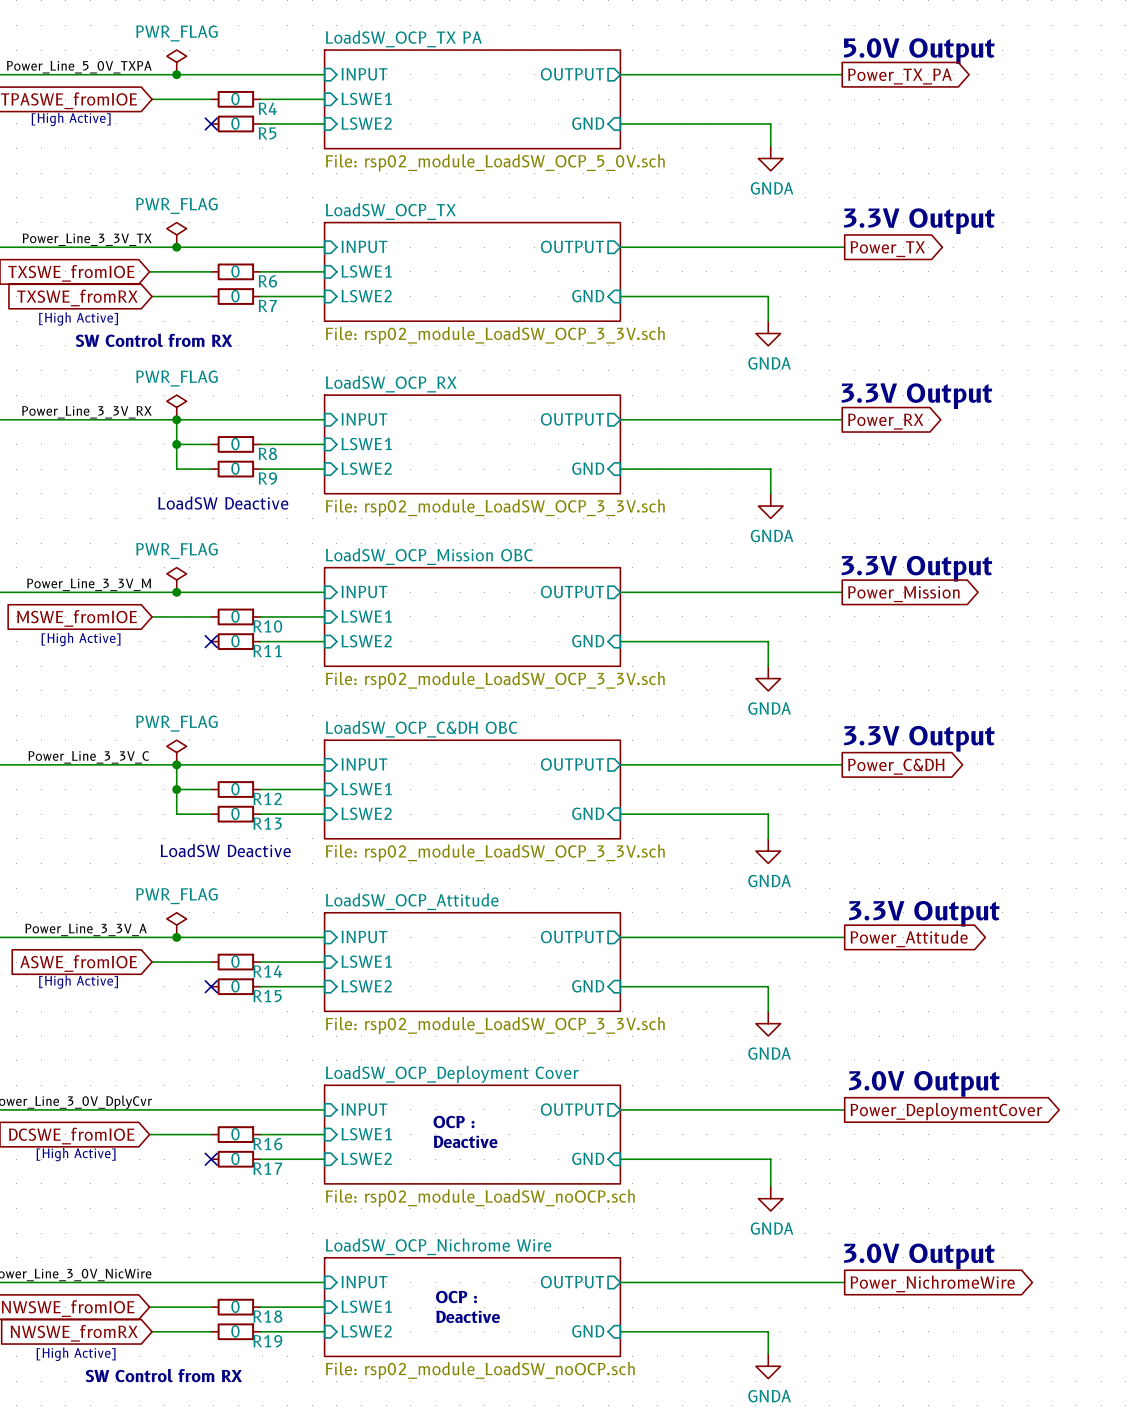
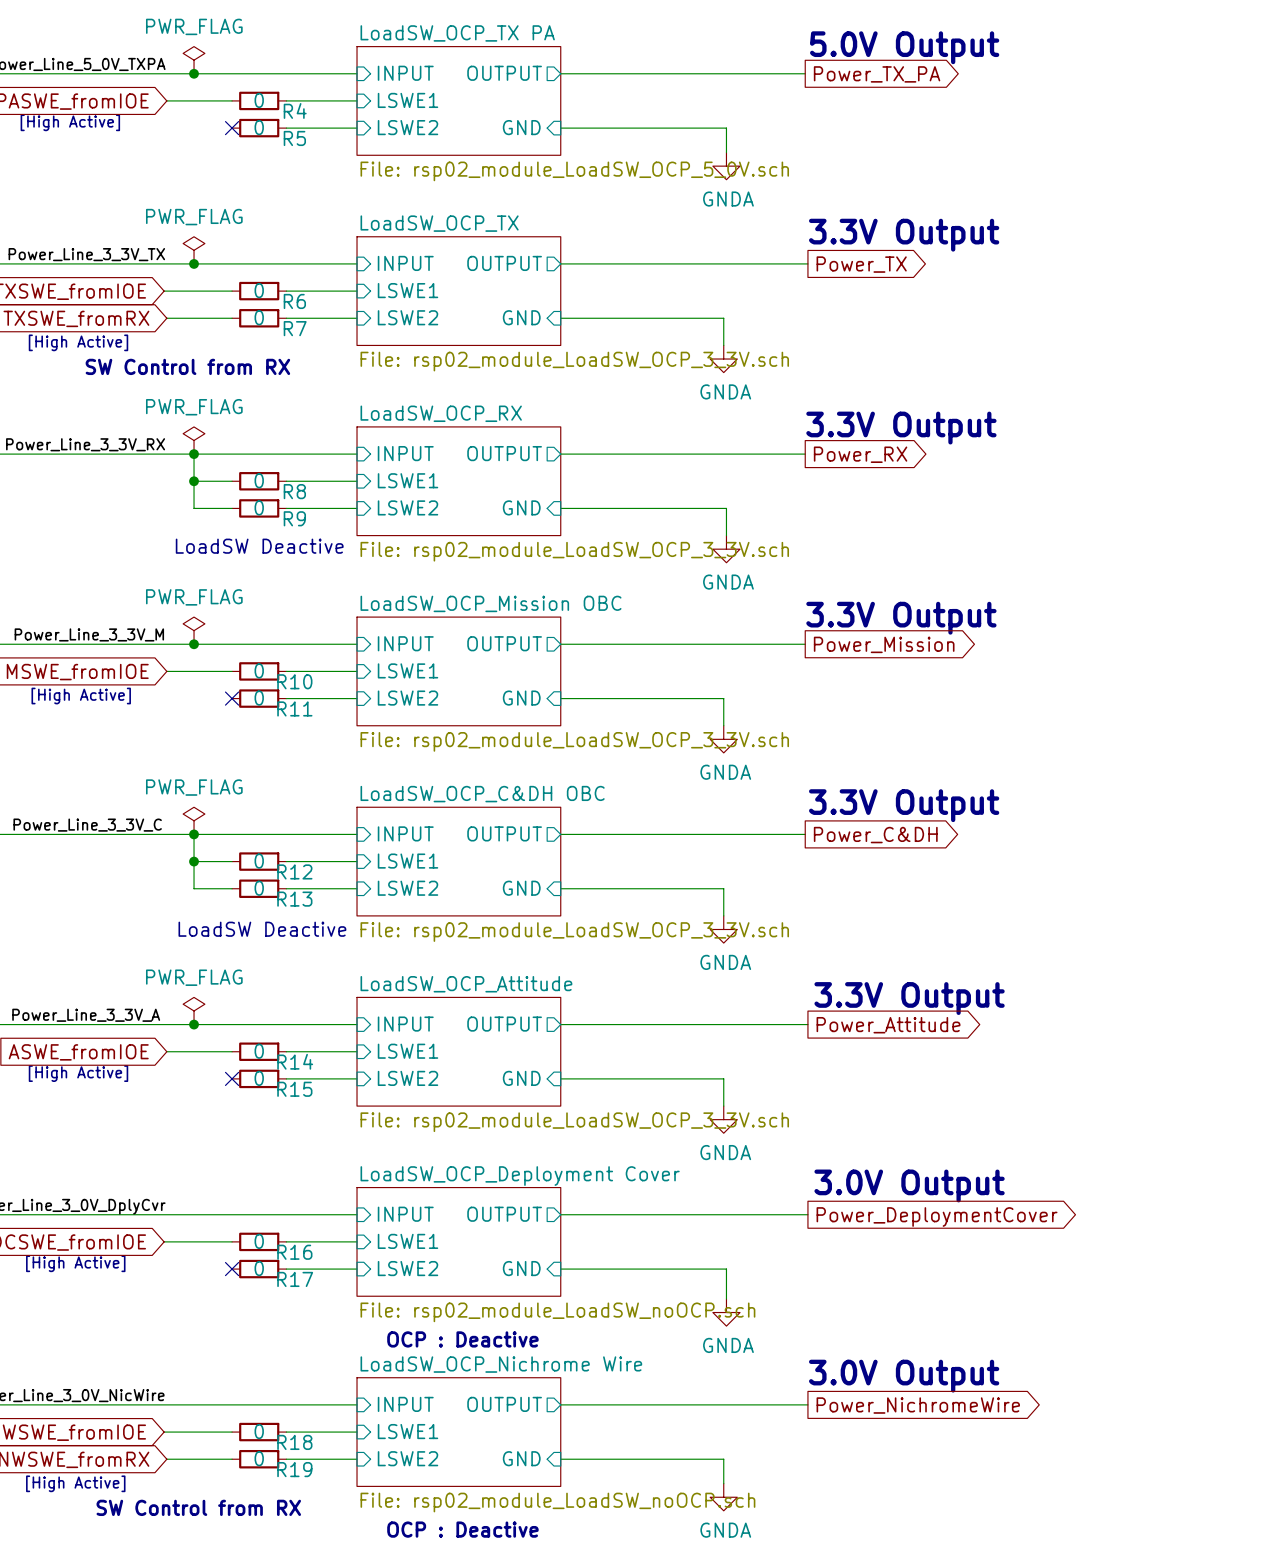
text position: 5.0V Output (919, 51) -> 5.0V Output (904, 47)
sheet pin: none -> OUTPUT (504, 73)
sheet pin: OUTPUT (572, 74) -> none
wire: (731, 74) (842, 74) -> (560, 73) (682, 73)
global label position: Power_TX_PA (899, 76) -> Power_TX_PA (877, 74)
sheet LoadSW_OCP_TX PA: none -> File: rsp02_module_LoadSW_OCP_5_0V.sch (458, 100)
sheet LoadSW_OCP_TX PA: File: rsp02_module_LoadSW_OCP_5_0V.sch (472, 99) -> none
sheet pin: none -> GND (521, 127)
wire: none -> (560, 128) (682, 128)
sheet pin: GND (588, 123) -> none
wire: (659, 123) (770, 123) (770, 146) -> (726, 128) (726, 152)
power symbol: none -> GNDA (726, 166)
power symbol: GNDA (770, 158) -> none
text position: 3.3V Output (919, 221) -> 3.3V Output (904, 235)
sheet pin: none -> OUTPUT (504, 263)
sheet pin: OUTPUT (572, 246) -> none
wire: (733, 247) (844, 247) -> (560, 263) (682, 263)
global label position: Power_TX (887, 249) -> Power_TX (861, 264)
sheet LoadSW_OCP_TX: none -> File: rsp02_module_LoadSW_OCP_3_3V.sch (458, 291)
sheet LoadSW_OCP_TX: File: rsp02_module_LoadSW_OCP_3_3V.sch (472, 271) -> none
sheet pin: none -> GND (521, 317)
wire: none -> (560, 318) (682, 318)
sheet pin: GND (588, 296) -> none
wire: (657, 296) (768, 296) (768, 321) -> (723, 318) (723, 345)
power symbol: none -> GNDA (723, 359)
power symbol: GNDA (768, 333) -> none
text position: 3.3V Output (916, 396) -> 3.3V Output (901, 428)
sheet pin: none -> OUTPUT (504, 453)
sheet pin: OUTPUT (572, 419) -> none
wire: (731, 419) (842, 419) -> (560, 454) (682, 454)
global label position: Power_RX (885, 421) -> Power_RX (860, 454)
sheet LoadSW_OCP_RX: none -> File: rsp02_module_LoadSW_OCP_3_3V.sch (458, 481)
sheet LoadSW_OCP_RX: File: rsp02_module_LoadSW_OCP_3_3V.sch (472, 444) -> none
sheet pin: none -> GND (521, 507)
sheet pin: GND (588, 468) -> none
wire: none -> (560, 508) (682, 508)
wire: (659, 469) (770, 469) (770, 493) -> (726, 508) (726, 535)
power symbol: none -> GNDA (726, 549)
power symbol: GNDA (770, 506) -> none
text position: 3.3V Output (916, 568) -> 3.3V Output (901, 618)
sheet pin: none -> OUTPUT (504, 643)
sheet pin: OUTPUT (572, 591) -> none
wire: (731, 592) (842, 592) -> (560, 644) (682, 644)
global label position: Power_Mission (903, 594) -> Power_Mission (884, 644)
sheet LoadSW_OCP_Mission OBC: none -> File: rsp02_module_LoadSW_OCP_3_3V.sch (458, 671)
sheet LoadSW_OCP_Mission OBC: File: rsp02_module_LoadSW_OCP_3_3V.sch (472, 616) -> none
sheet pin: none -> GND (521, 698)
wire: none -> (560, 698) (682, 698)
sheet pin: GND (588, 641) -> none
wire: (657, 641) (768, 641) (768, 666) -> (723, 698) (723, 725)
power symbol: none -> GNDA (723, 739)
power symbol: GNDA (768, 678) -> none
text position: 3.3V Output (919, 738) -> 3.3V Output (904, 805)
sheet pin: none -> OUTPUT (504, 833)
sheet pin: OUTPUT (572, 764) -> none
wire: (731, 764) (842, 764) -> (560, 834) (682, 834)
global label position: Power_C&DH (896, 766) -> Power_C&DH (875, 835)
sheet LoadSW_OCP_C&DH OBC: none -> File: rsp02_module_LoadSW_OCP_3_3V.sch (458, 861)
sheet LoadSW_OCP_C&DH OBC: File: rsp02_module_LoadSW_OCP_3_3V.sch (472, 789) -> none
sheet pin: none -> GND (521, 888)
sheet pin: GND (588, 813) -> none
wire: none -> (560, 888) (682, 888)
wire: (657, 814) (768, 814) (768, 838) -> (723, 888) (723, 915)
power symbol: none -> GNDA (723, 929)
power symbol: GNDA (768, 851) -> none
text position: 3.3V Output (924, 913) -> 3.3V Output (909, 998)
sheet pin: none -> OUTPUT (504, 1024)
sheet pin: OUTPUT (572, 937) -> none
wire: (733, 937) (844, 937) -> (560, 1024) (682, 1024)
global label position: Power_Attitude (909, 938) -> Power_Attitude (888, 1025)
sheet LoadSW_OCP_Attitude: none -> File: rsp02_module_LoadSW_OCP_3_3V.sch (458, 1051)
sheet LoadSW_OCP_Attitude: File: rsp02_module_LoadSW_OCP_3_3V.sch (472, 962) -> none
sheet pin: none -> GND (521, 1078)
wire: none -> (560, 1078) (682, 1078)
sheet pin: GND (588, 986) -> none
wire: (657, 986) (768, 986) (768, 1011) -> (723, 1078) (723, 1106)
power symbol: none -> GNDA (723, 1119)
power symbol: GNDA (768, 1023) -> none
text position: 3.0V Output (924, 1083) -> 3.0V Output (909, 1185)
sheet pin: none -> OUTPUT (504, 1214)
sheet pin: OUTPUT (572, 1109) -> none
wire: (733, 1109) (844, 1109) -> (560, 1214) (682, 1214)
global label position: Power_DeploymentCover (946, 1111) -> Power_DeploymentCover (937, 1216)
text: OCP : (454, 1122) -> none
sheet LoadSW_OCP_Deployment Cover: none -> File: rsp02_module_LoadSW_noOCP.sch (458, 1241)
sheet LoadSW_OCP_Deployment Cover: File: rsp02_module_LoadSW_noOCP.sch (472, 1134) -> none
text: Deactive (465, 1141) -> none
sheet pin: none -> GND (521, 1268)
sheet pin: GND (588, 1158) -> none
wire: none -> (560, 1269) (682, 1269)
wire: (659, 1159) (770, 1159) (770, 1186) -> (726, 1269) (726, 1298)
power symbol: none -> GNDA (726, 1312)
power symbol: GNDA (770, 1198) -> none
text: none -> OCP : Deactive (462, 1339)
text position: 3.0V Output (919, 1256) -> 3.0V Output (904, 1376)
sheet pin: none -> OUTPUT (504, 1404)
sheet pin: OUTPUT (572, 1282) -> none
wire: (733, 1282) (844, 1282) -> (560, 1404) (682, 1404)
global label position: Power_NichromeWire (932, 1283) -> Power_NichromeWire (918, 1405)
text: OCP : (456, 1297) -> none
sheet LoadSW_OCP_Nichrome Wire: none -> File: rsp02_module_LoadSW_noOCP.sch (458, 1432)
sheet LoadSW_OCP_Nichrome Wire: File: rsp02_module_LoadSW_noOCP.sch (472, 1307) -> none
text: Deactive (468, 1316) -> none
sheet pin: none -> GND (521, 1458)
wire: none -> (560, 1459) (682, 1459)
sheet pin: GND (588, 1331) -> none
wire: (657, 1331) (768, 1331) (768, 1353) -> (723, 1459) (723, 1483)
power symbol: none -> GNDA (723, 1497)
power symbol: GNDA (768, 1366) -> none
text: none -> OCP : Deactive (462, 1529)

